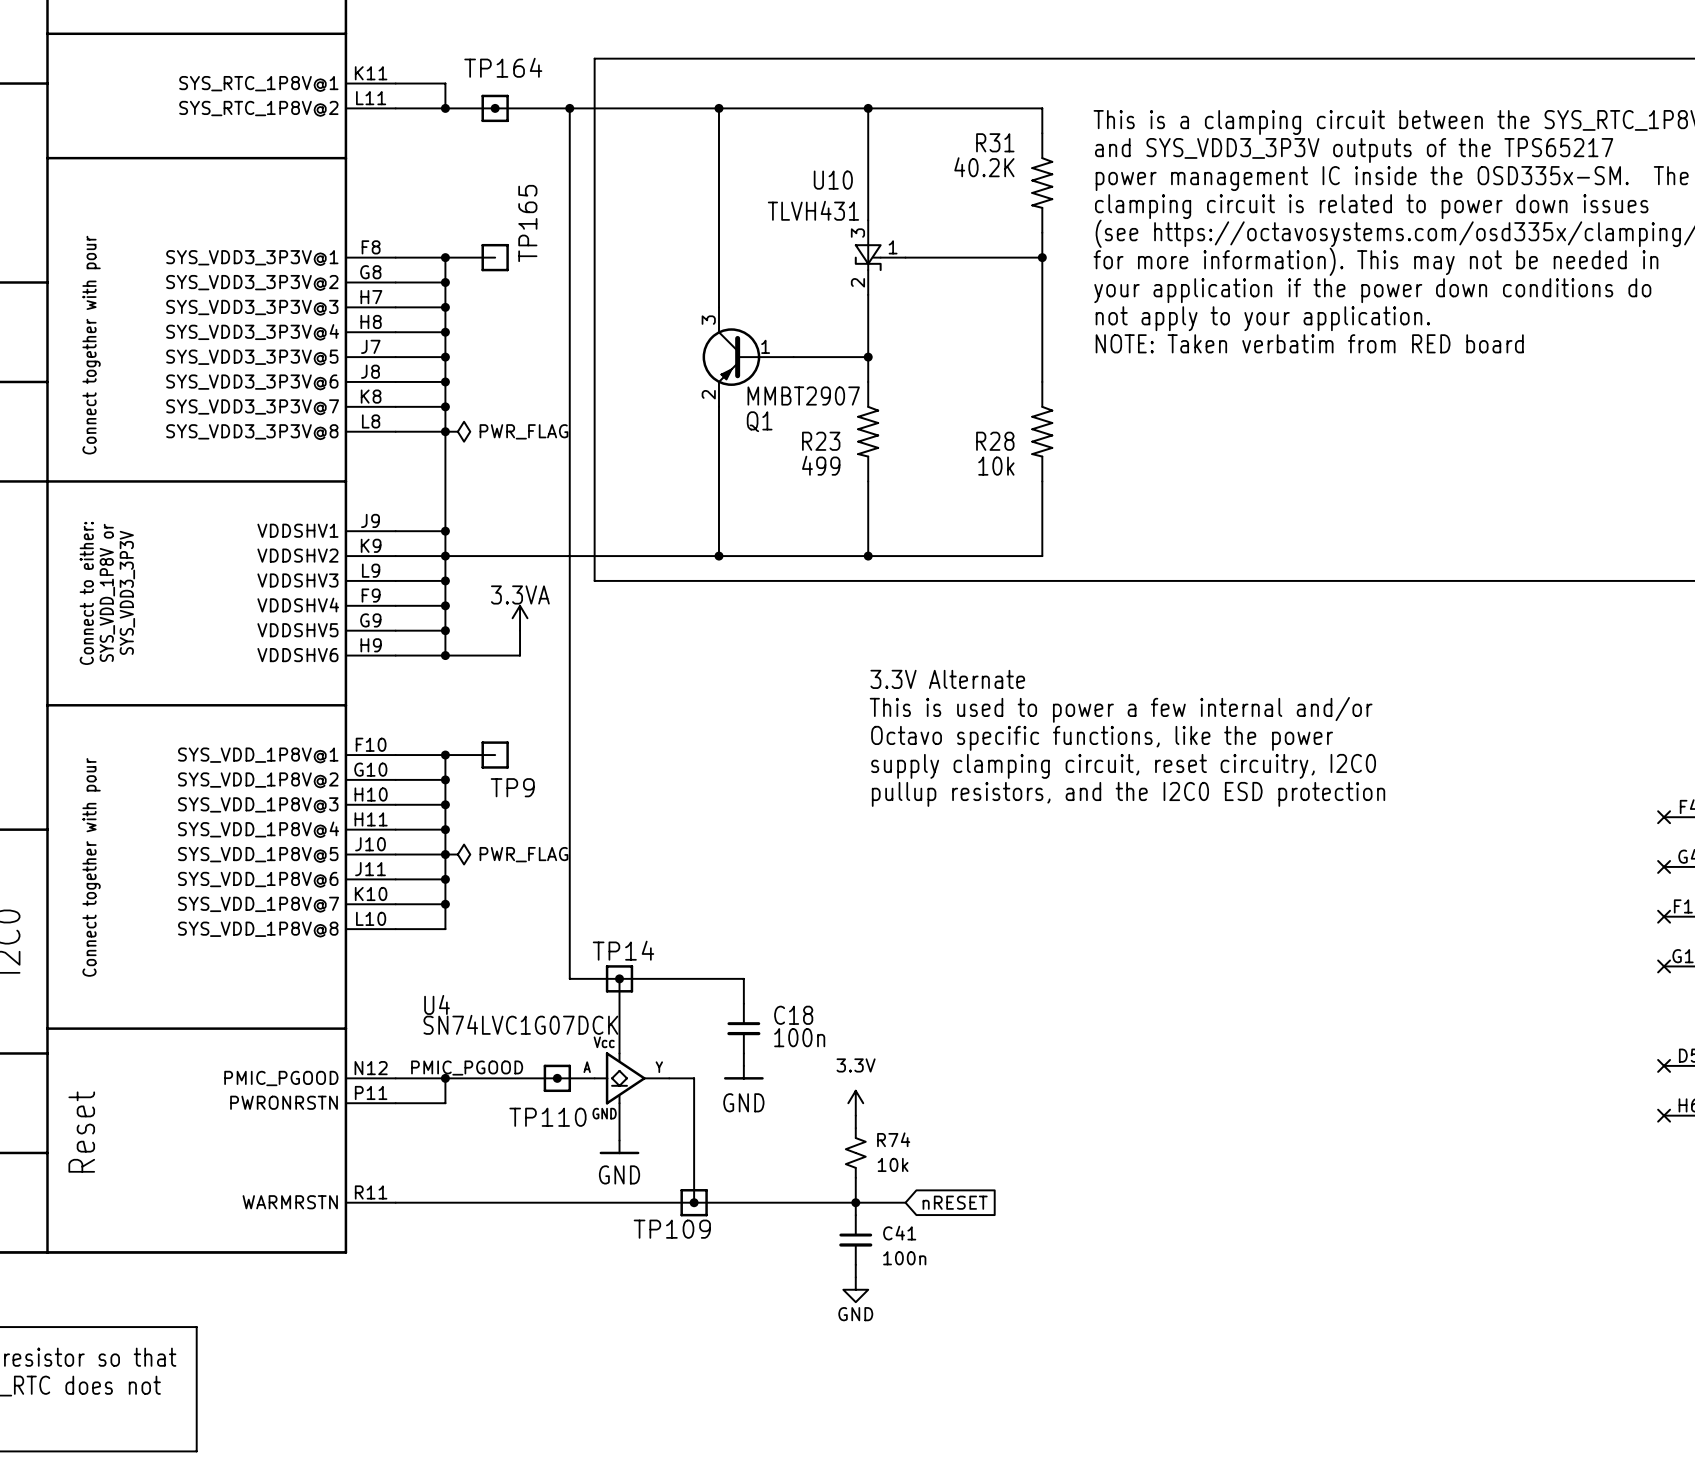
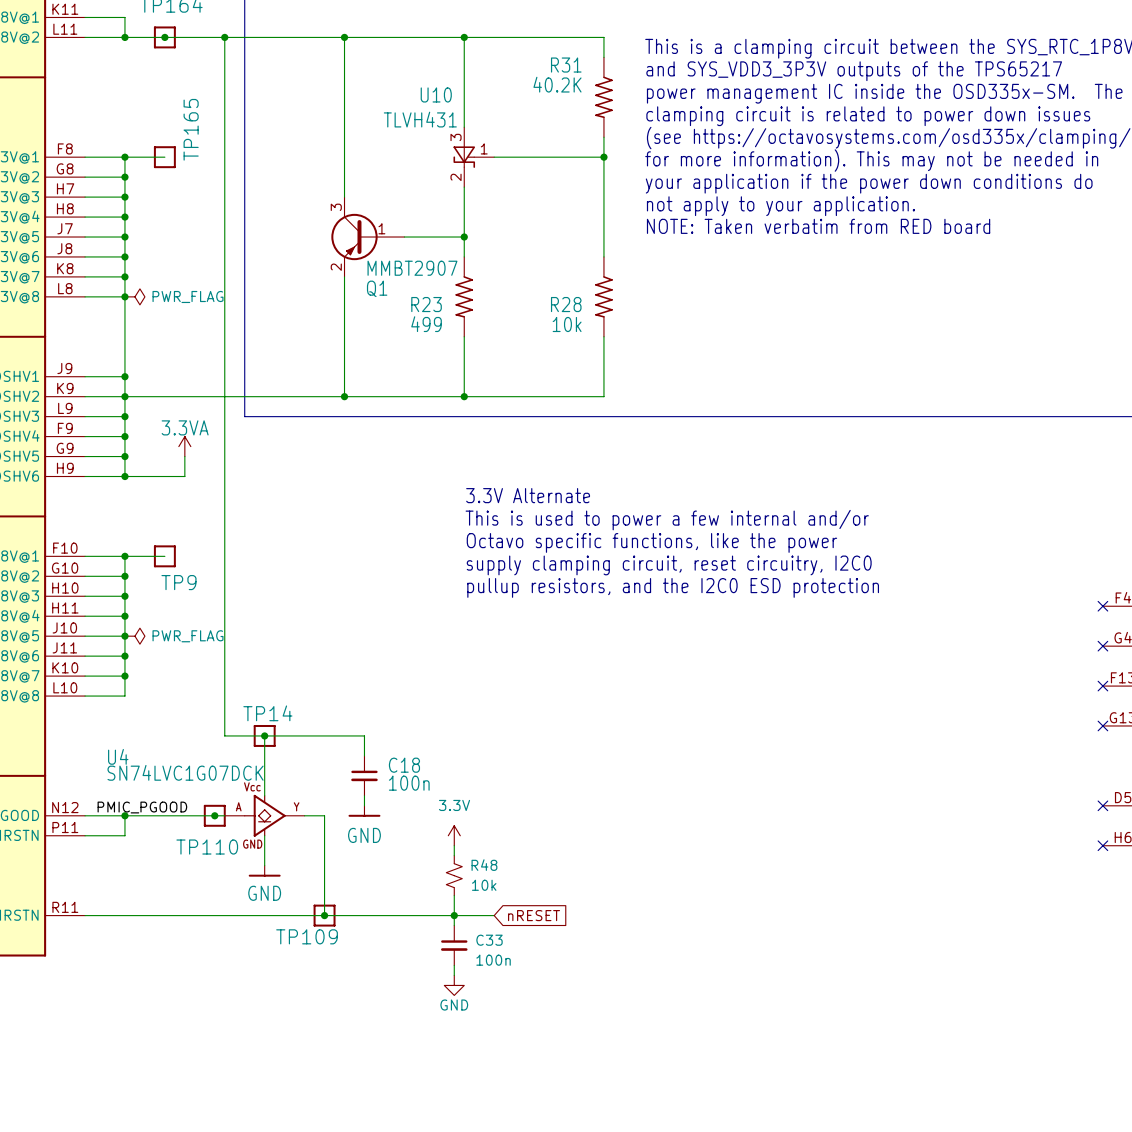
R74 name: R74 (893, 1139) -> R48 (484, 865)
C41 name: C41 (899, 1233) -> C33 (489, 940)

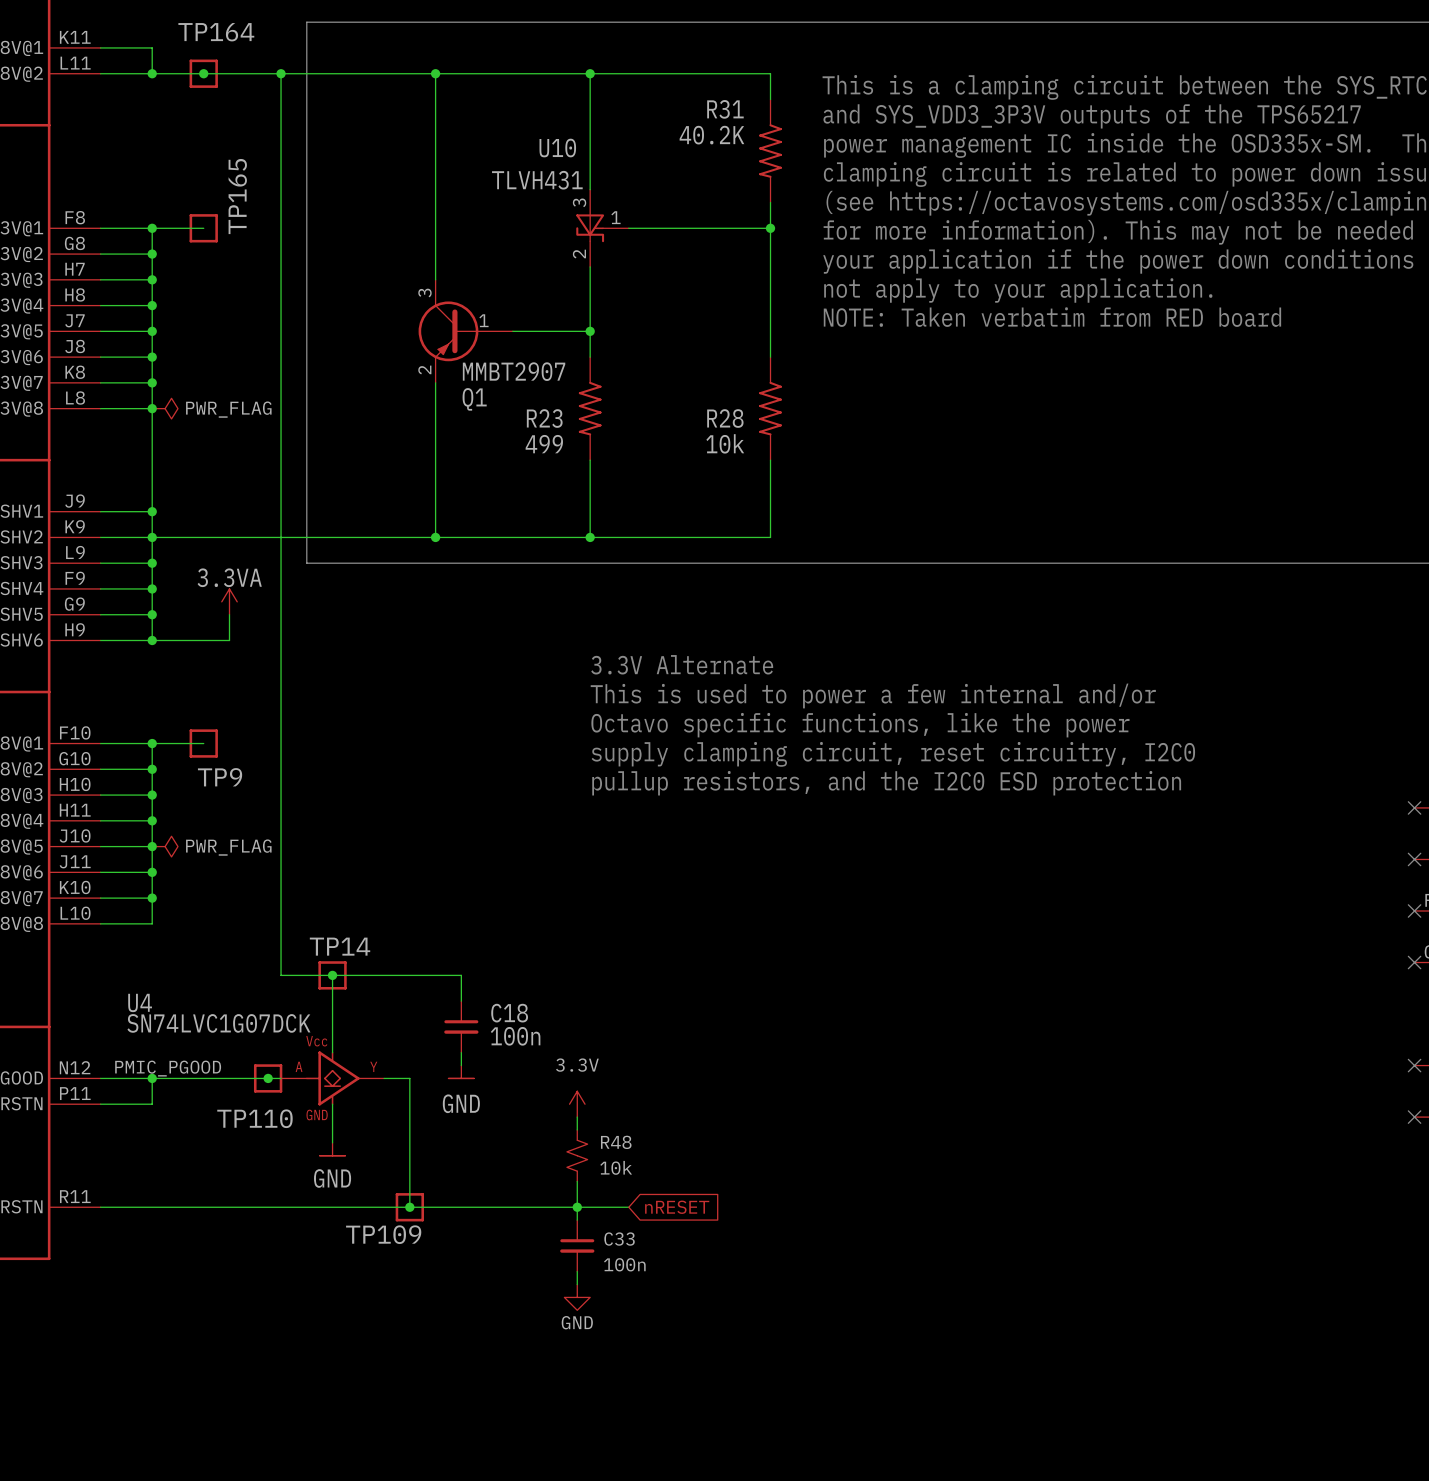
power symbol shape: [348, 805, 381, 817] -> [448, 1065, 475, 1079]
power symbol shape: [248, 865, 281, 877] -> [319, 1142, 346, 1156]

